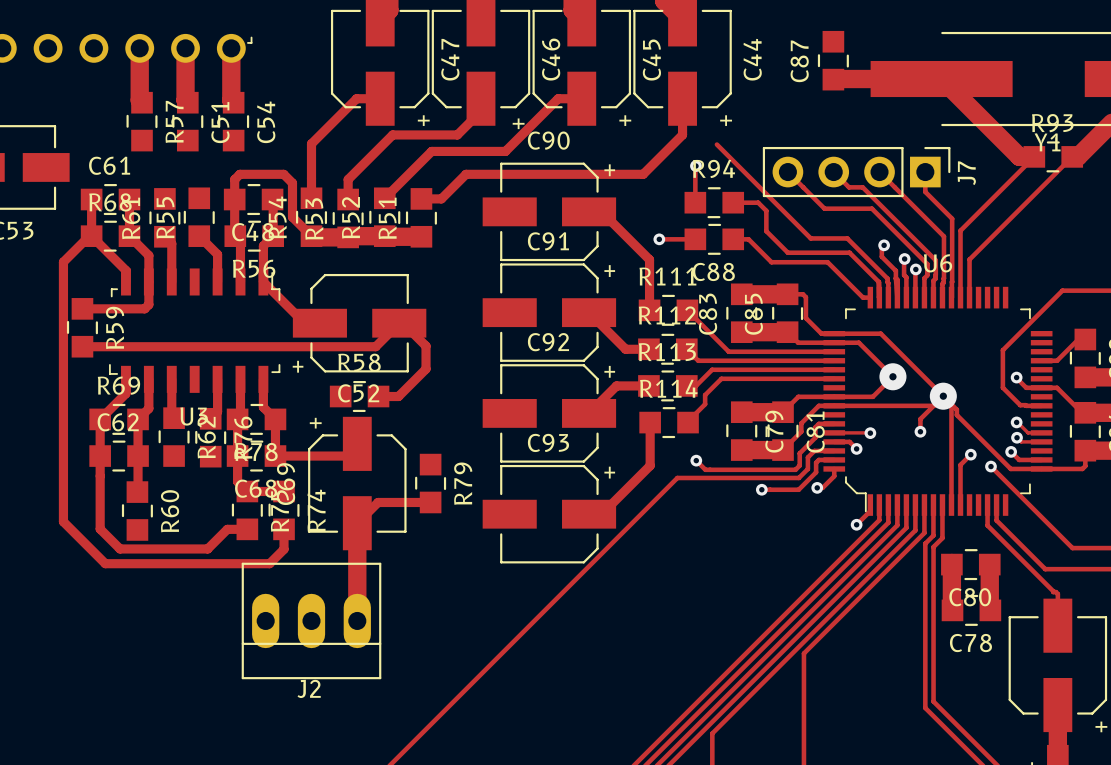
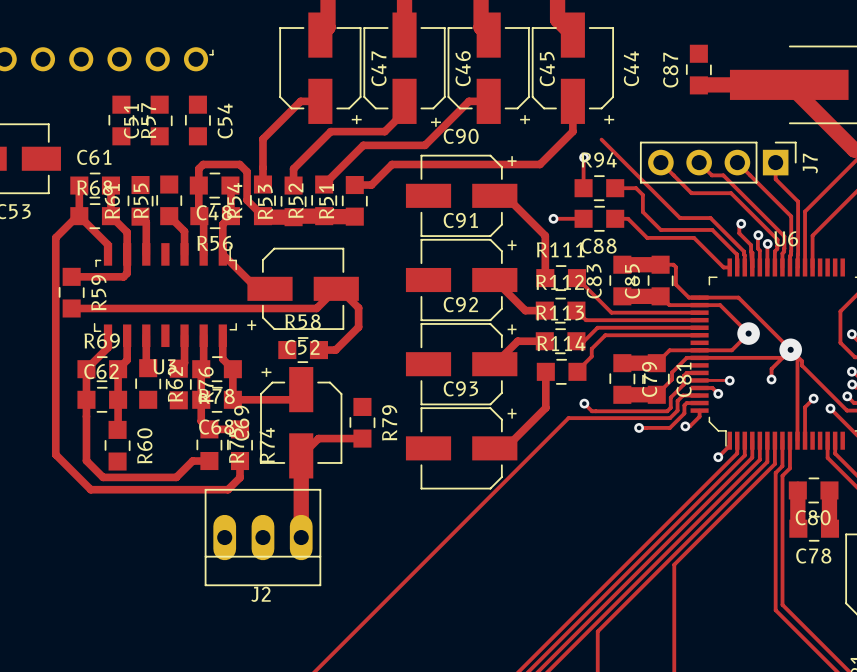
track: (139, 48) (139, 100) (142, 102) -> none
track: (185, 48) (185, 100) (187, 102) -> none
track: (231, 48) (231, 100) (233, 102) -> none
C51 name position: C51 (220, 122) -> C51 (131, 121)

